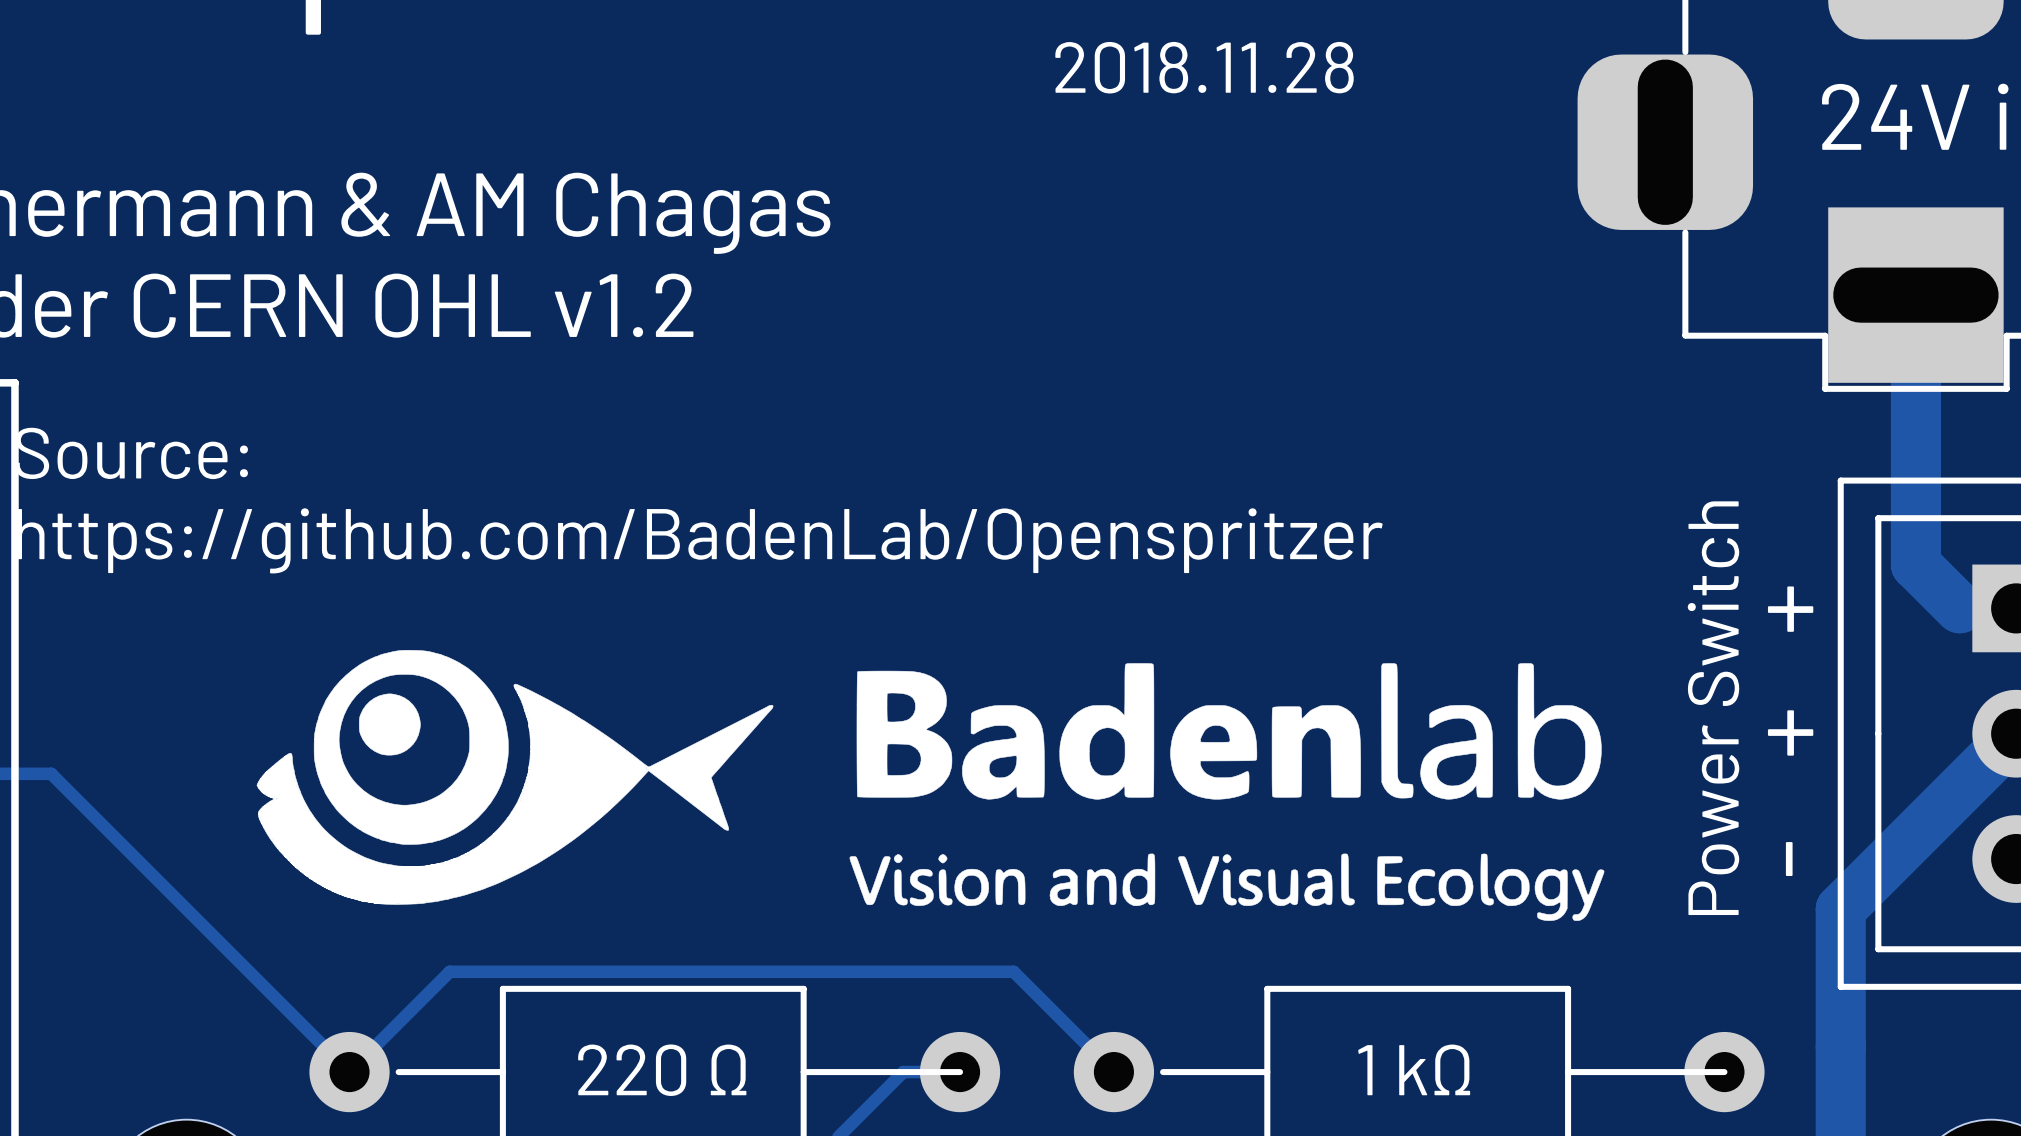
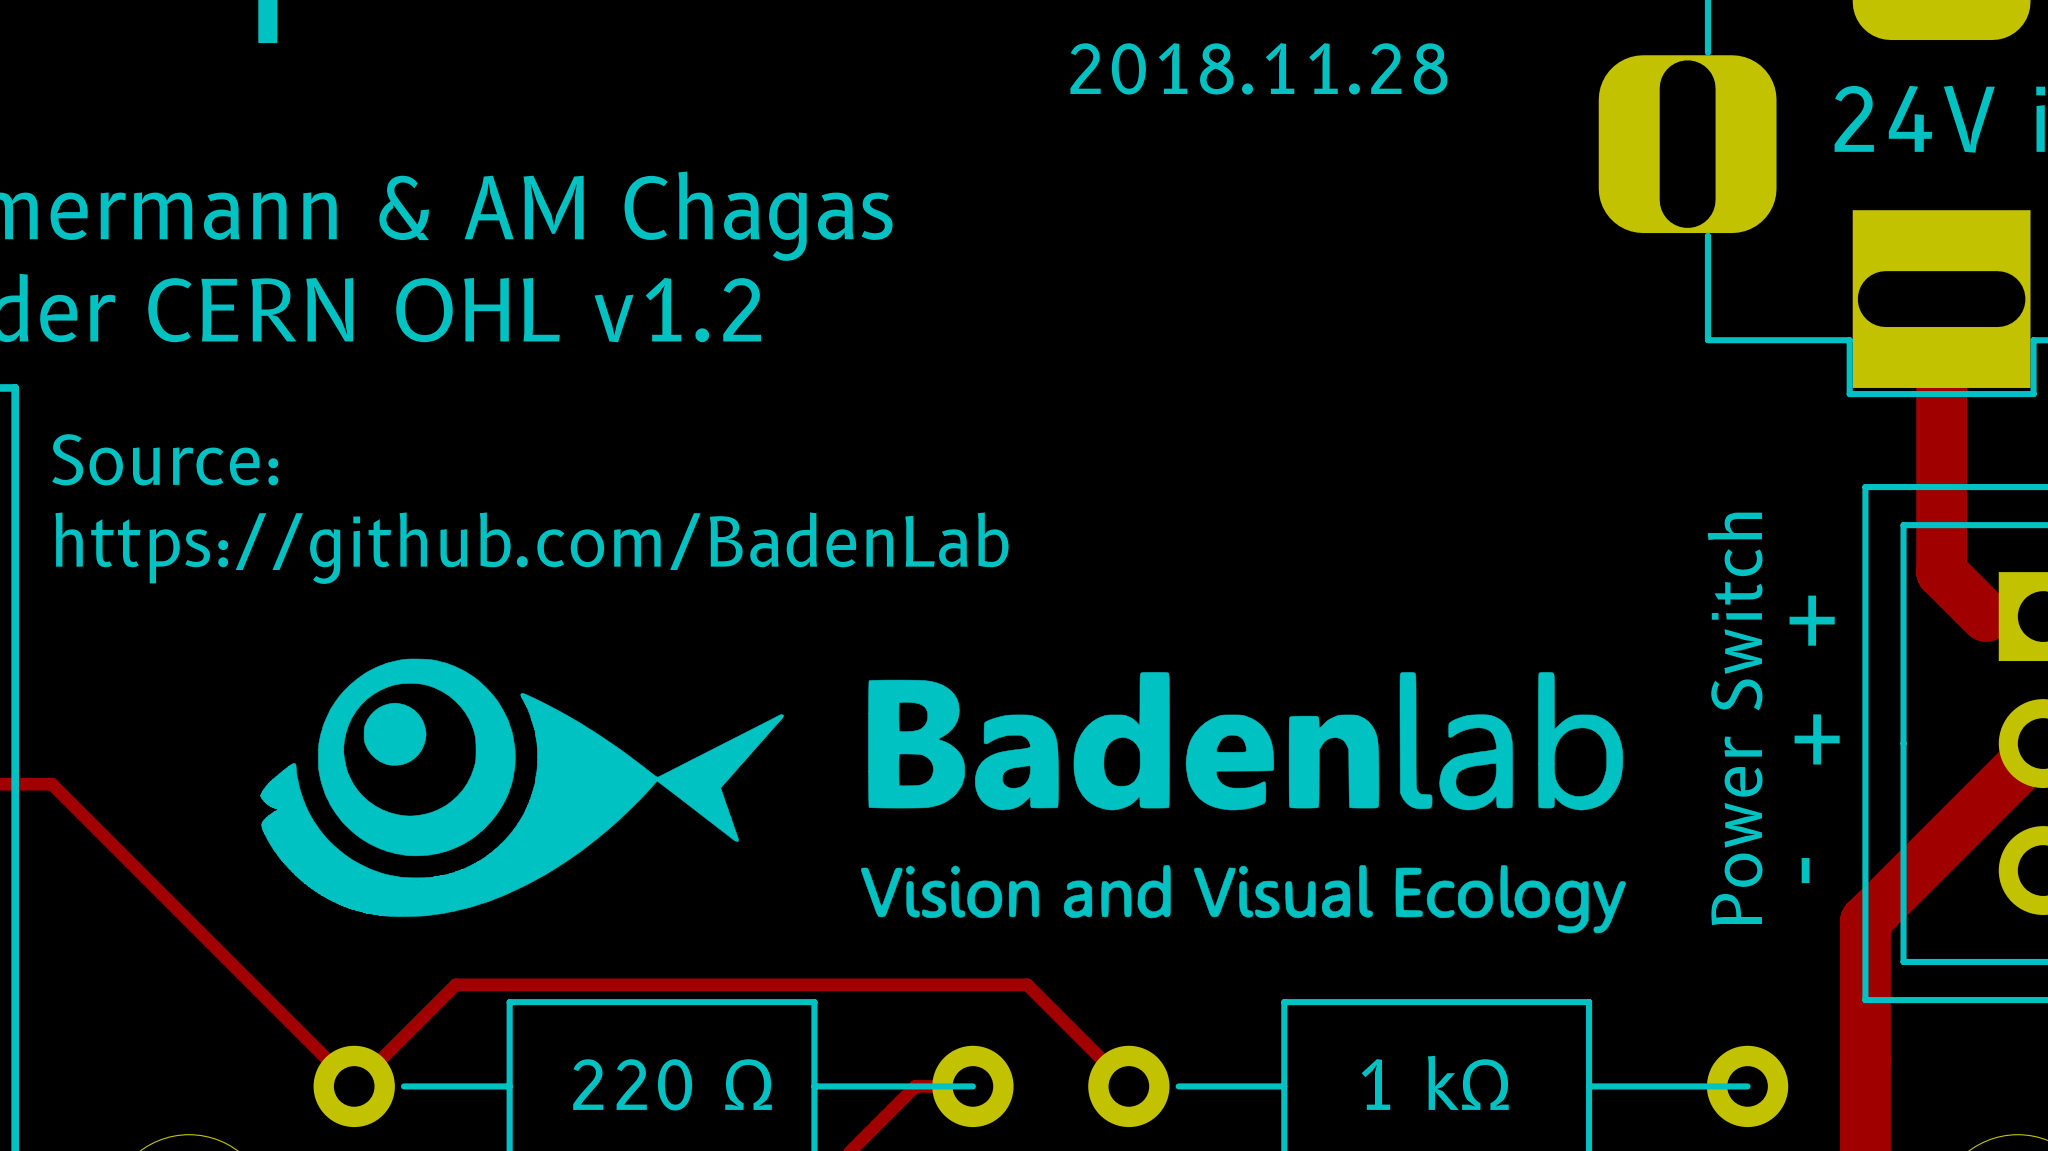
text position: Source: (131, 453) -> Source: (165, 459)
text: https://github.com/BadenLab/Openspritzer (699, 540) -> https://github.com/BadenLab (532, 548)

